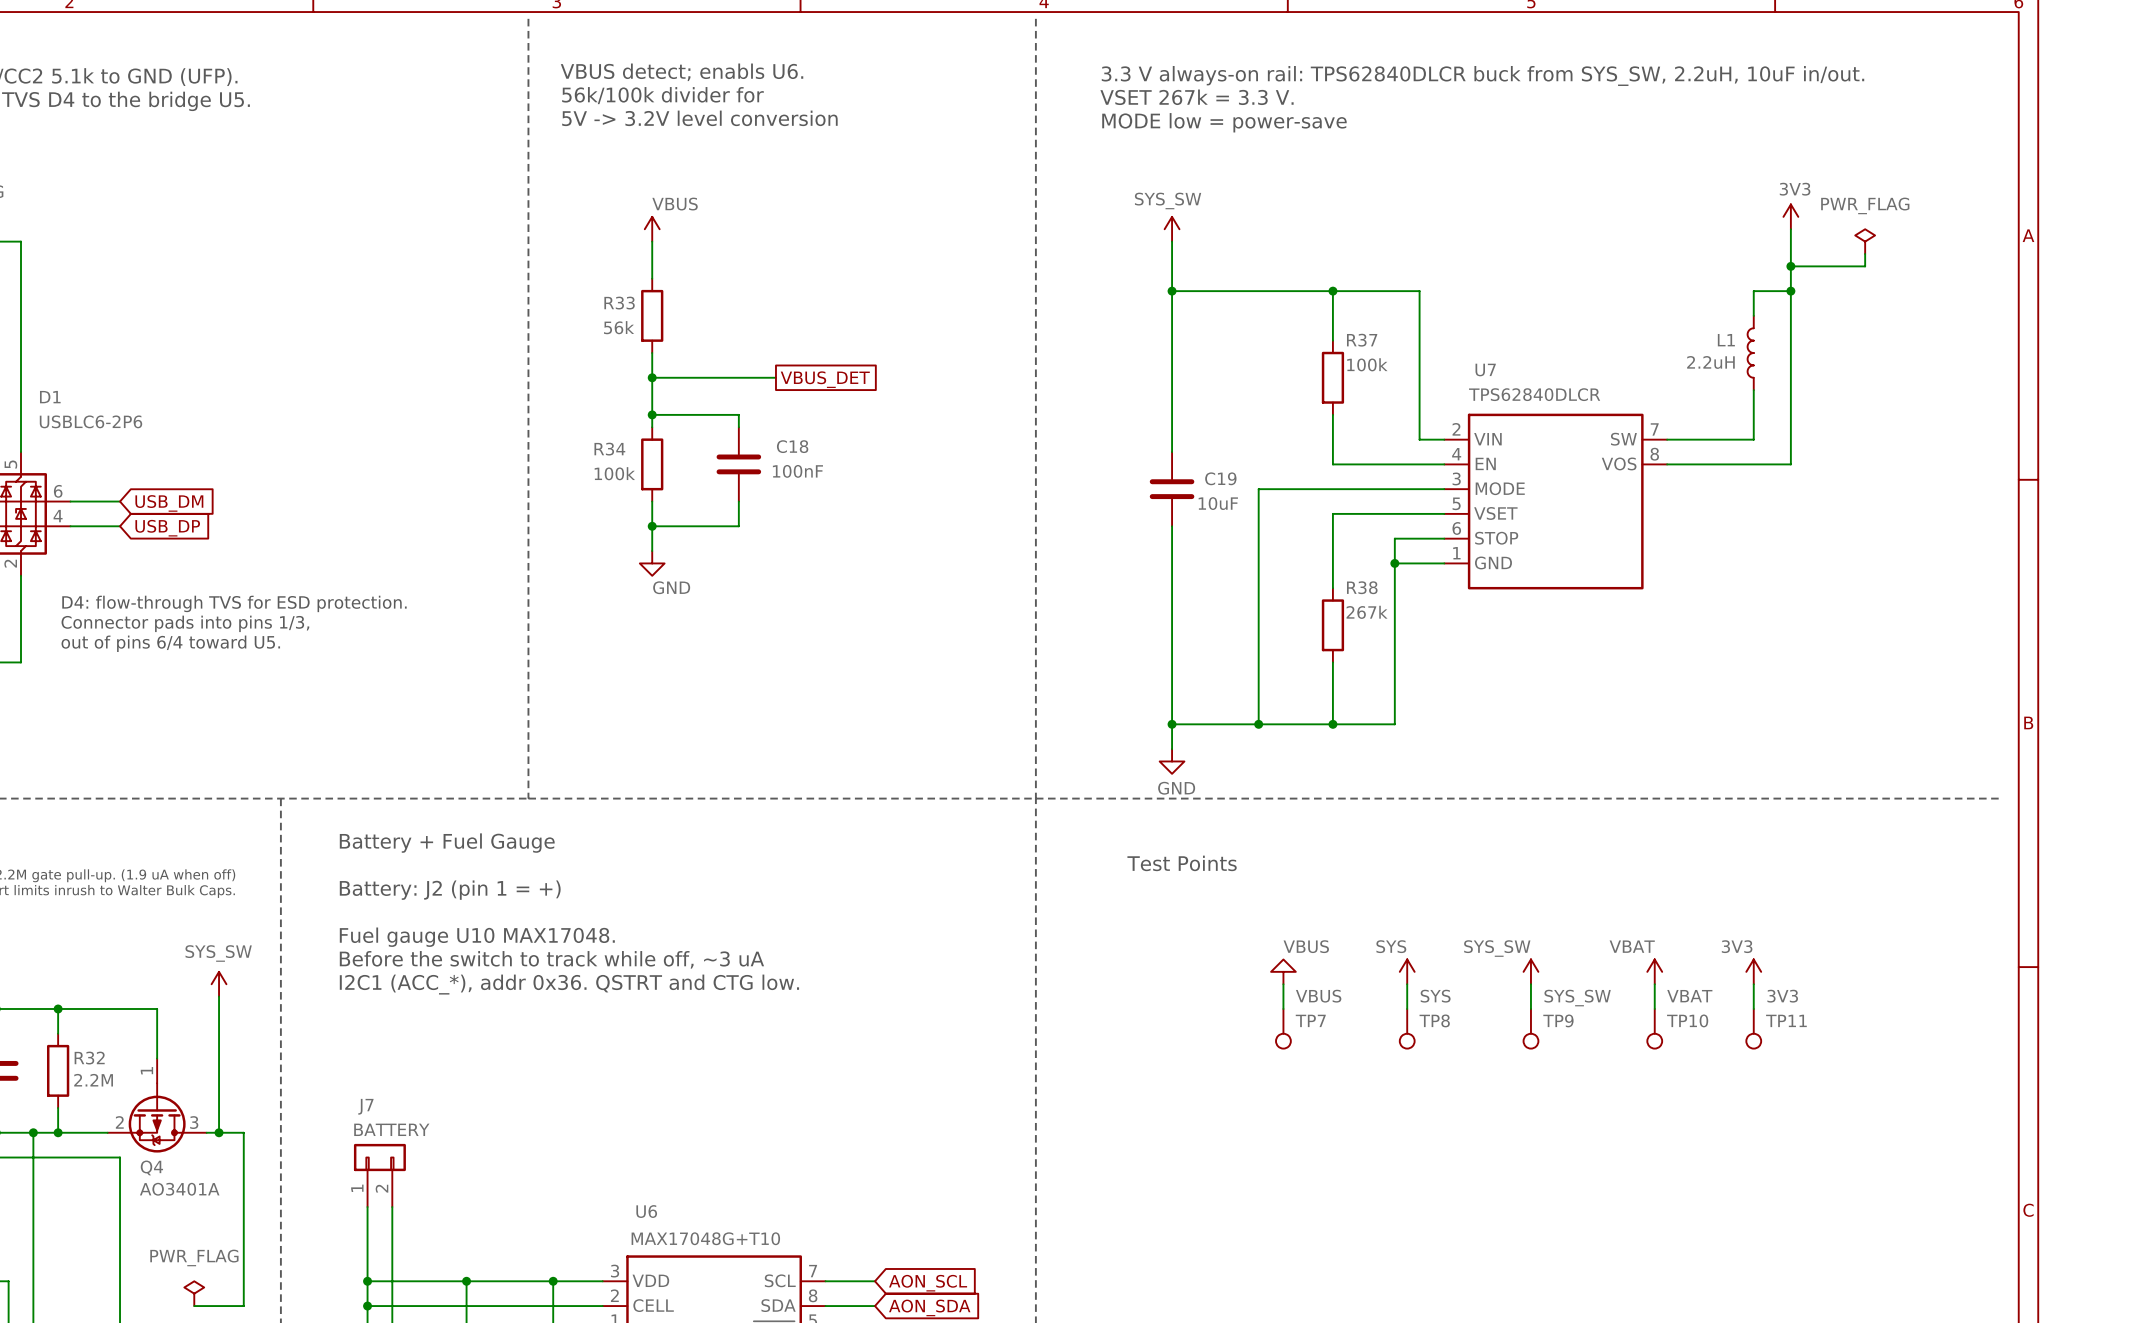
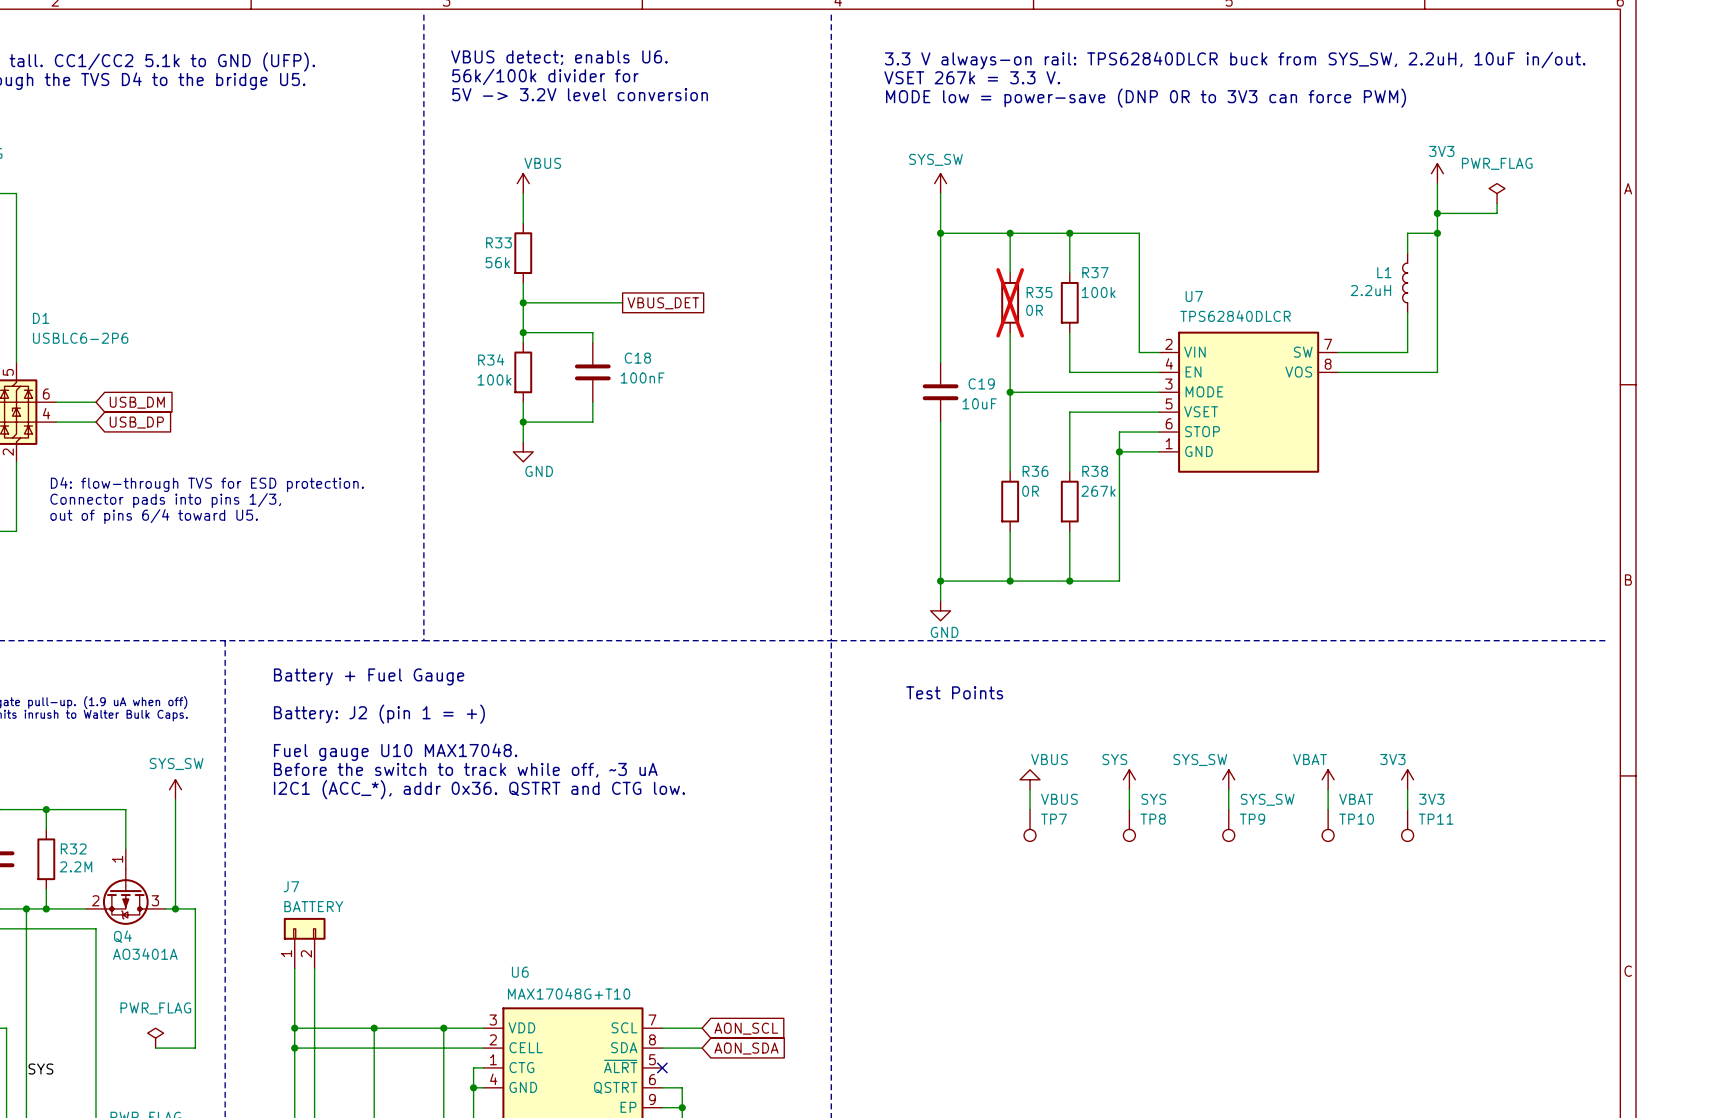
text: MODE low = power-save (1224, 122) -> MODE low = power-save (DNP 0R to 3V3 can force PWM) (1146, 98)
wire: none -> (1010, 233) (1010, 273)
junction: none -> (1010, 233)
R35: none -> 0R (1010, 302)
junction: none -> (1010, 392)
wire: (1258, 588) (1258, 662) -> (1010, 332) (1010, 392)
R36: none -> 0R (1010, 501)

